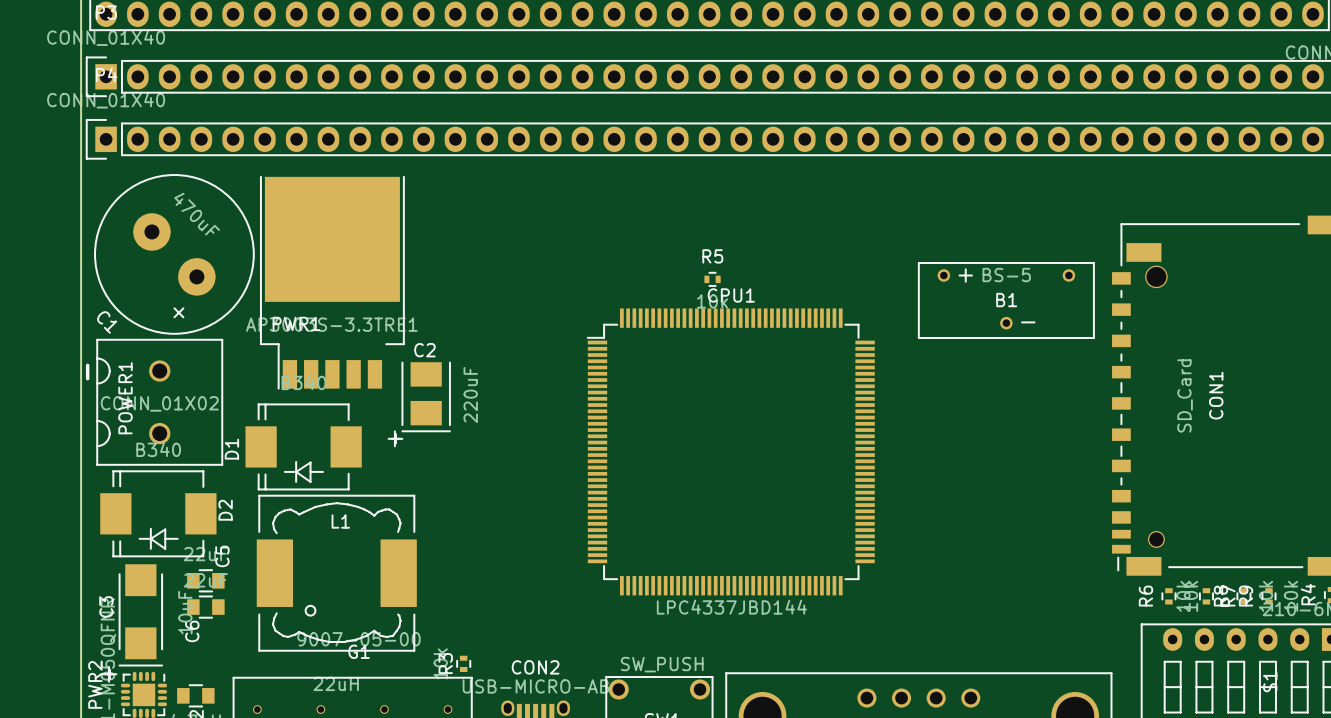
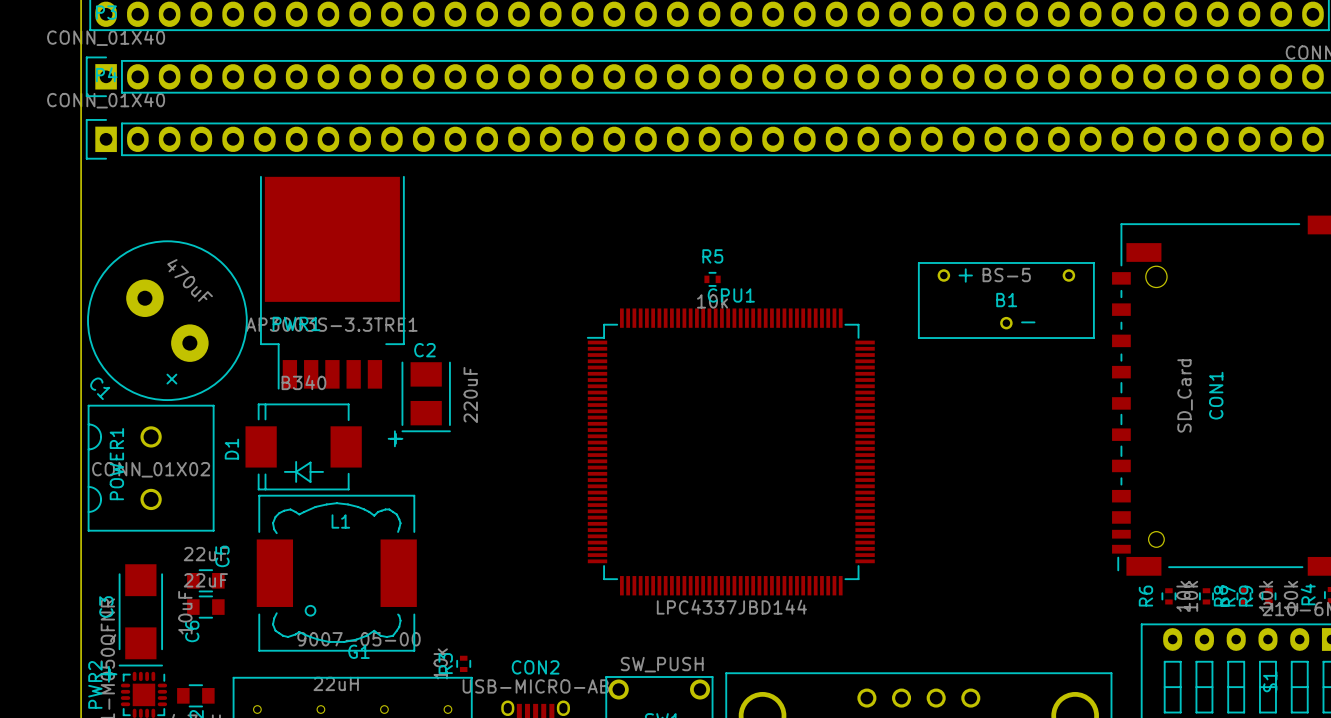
C1 position: (174, 254) -> (167, 320)
text: - (87, 372) -> none
POWER1 position: (159, 402) -> (151, 468)
D2: B340 (158, 513) -> none

